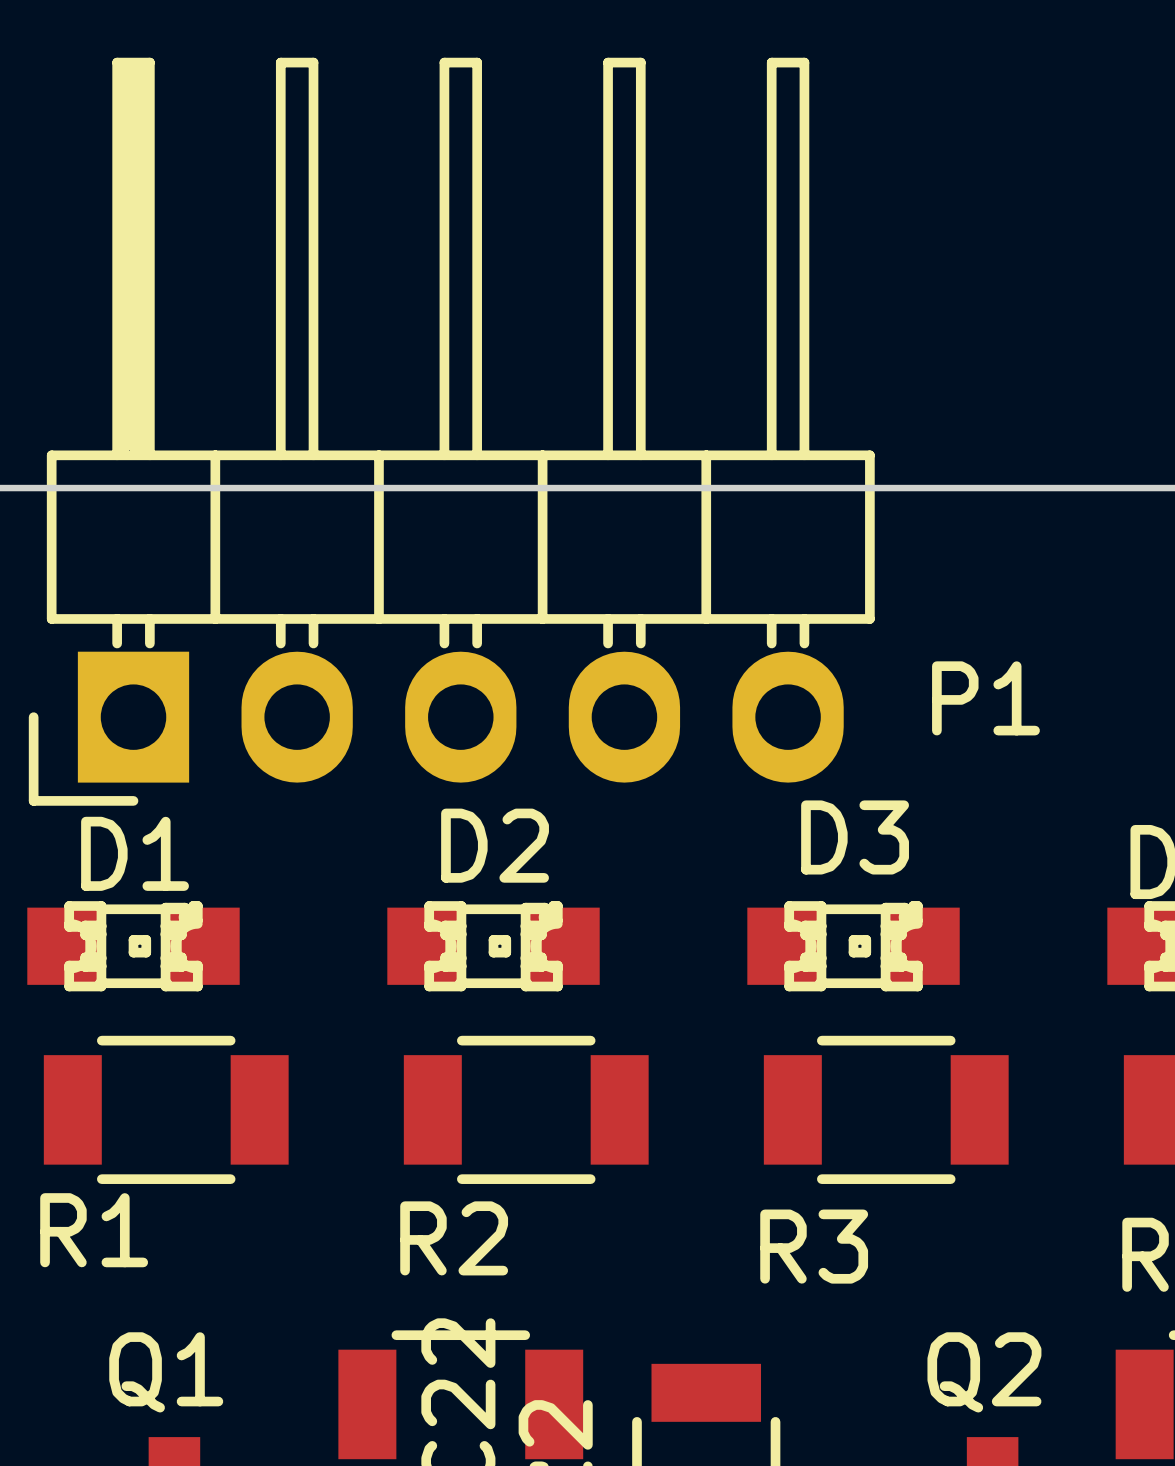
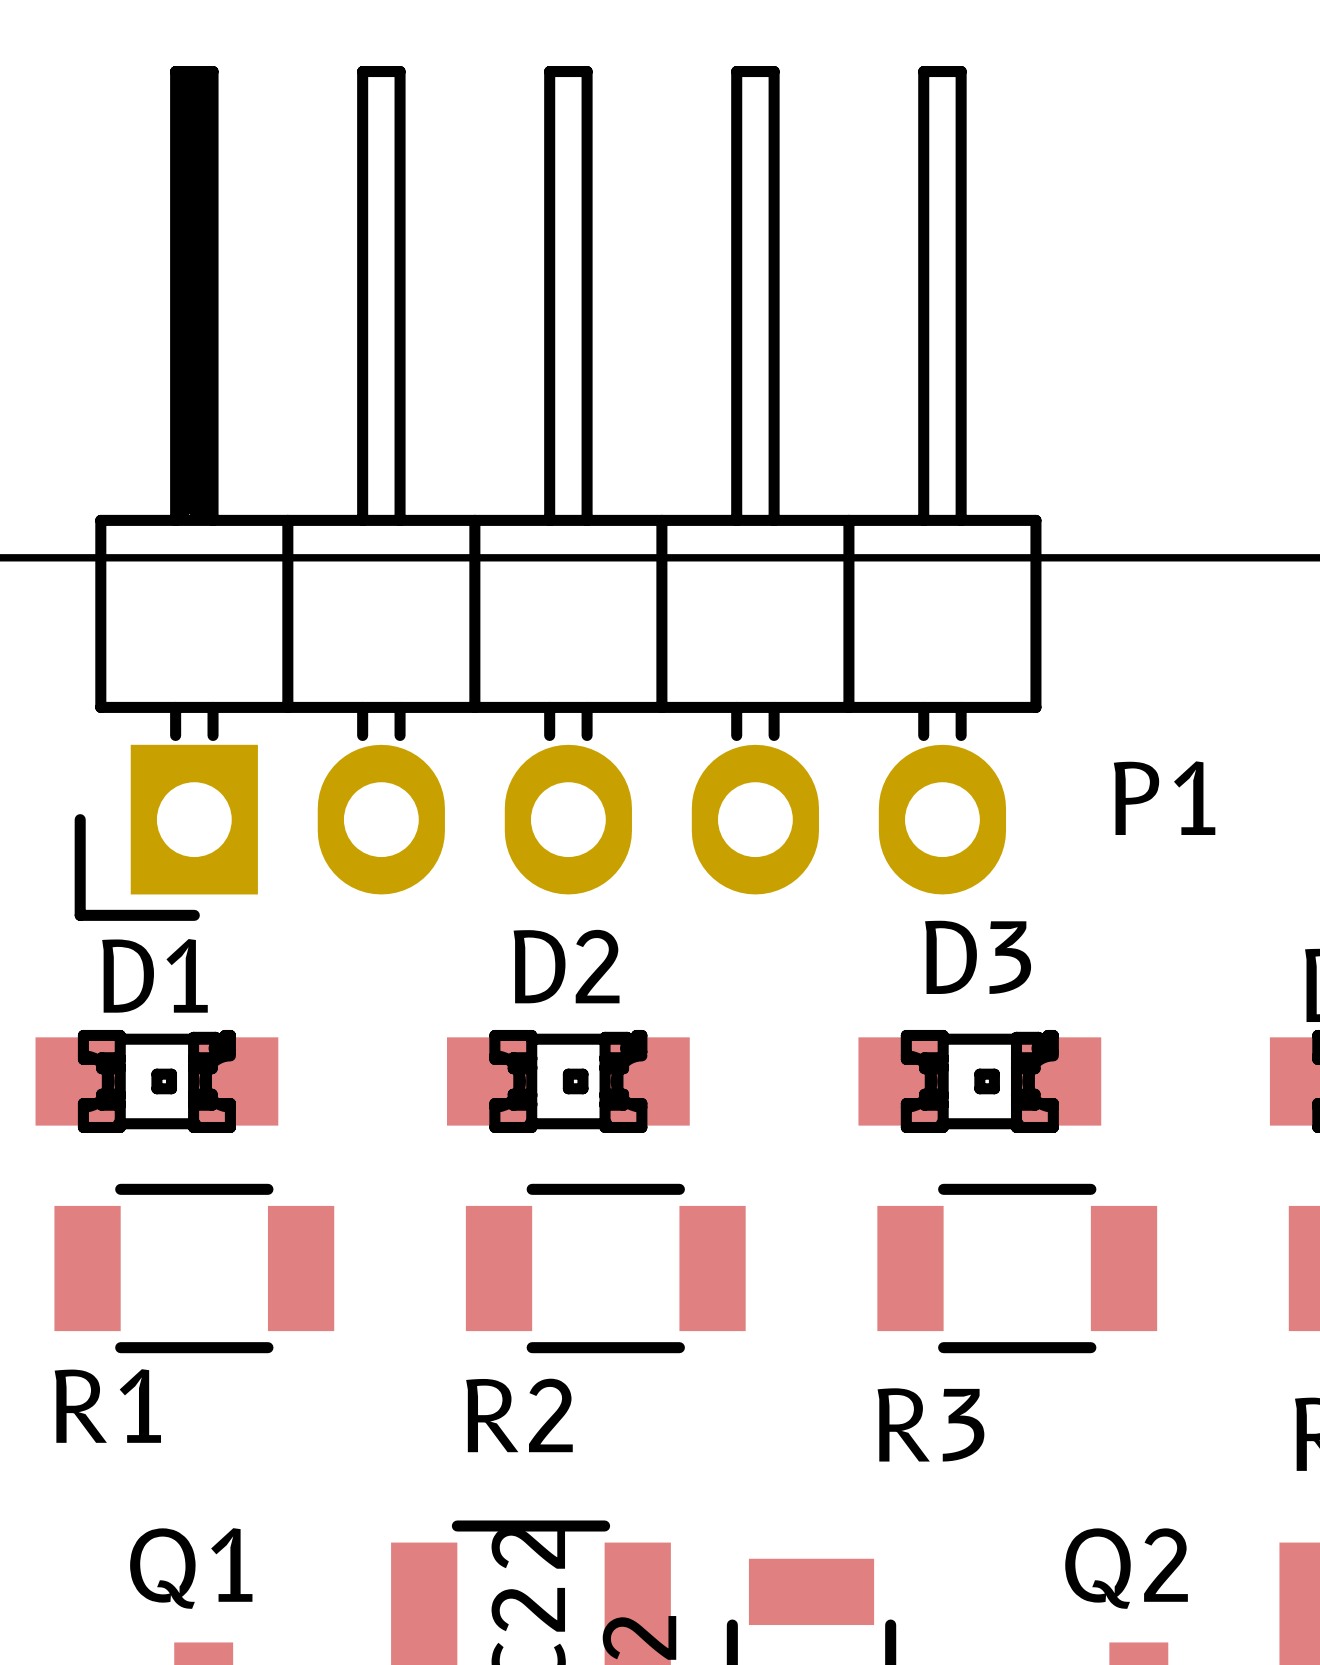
P1 position: (451, 431) -> (558, 493)

